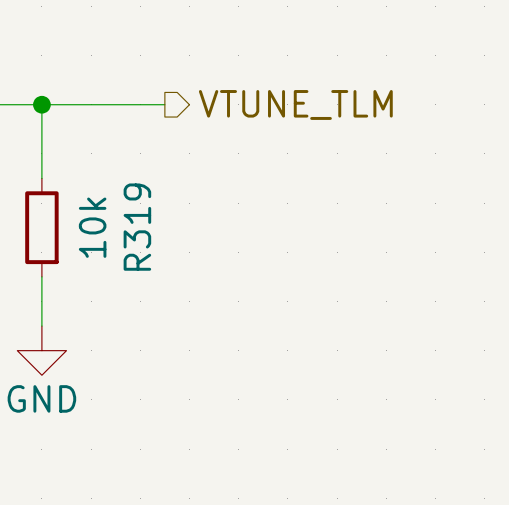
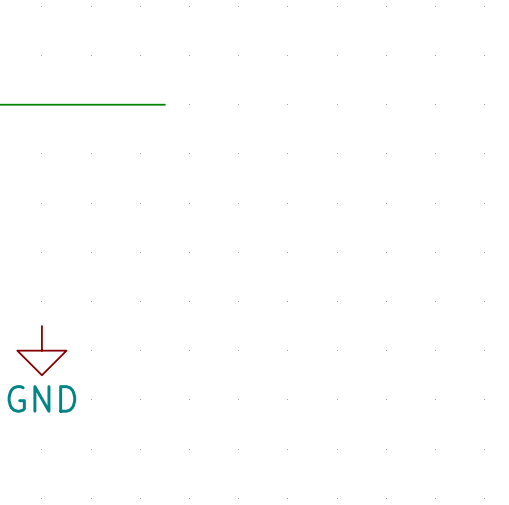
wire: (41, 104) (41, 178) -> none
junction: (41, 104) -> none
hierarchical label: VTUNE_TLM (295, 104) -> none
R319: 10k (41, 227) -> none
wire: (41, 276) (41, 326) -> none

